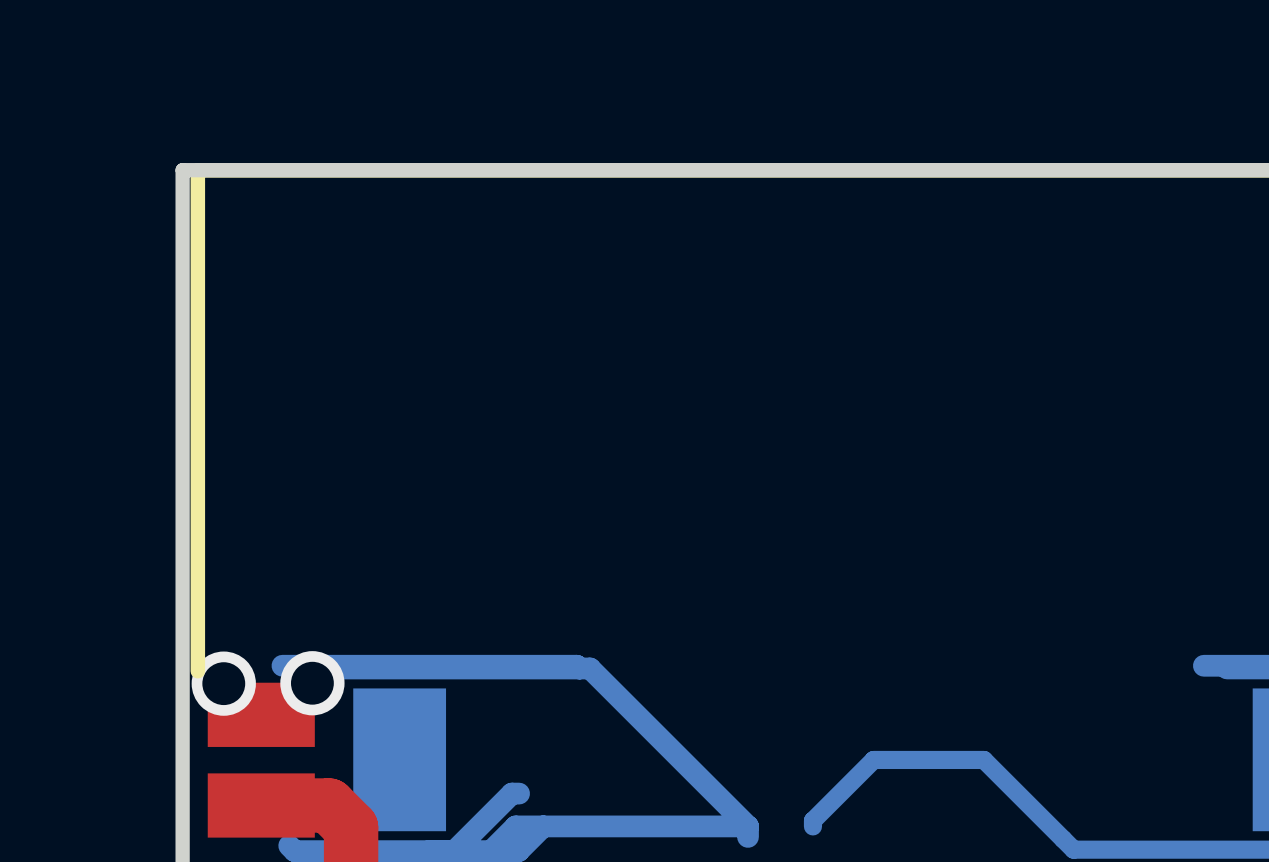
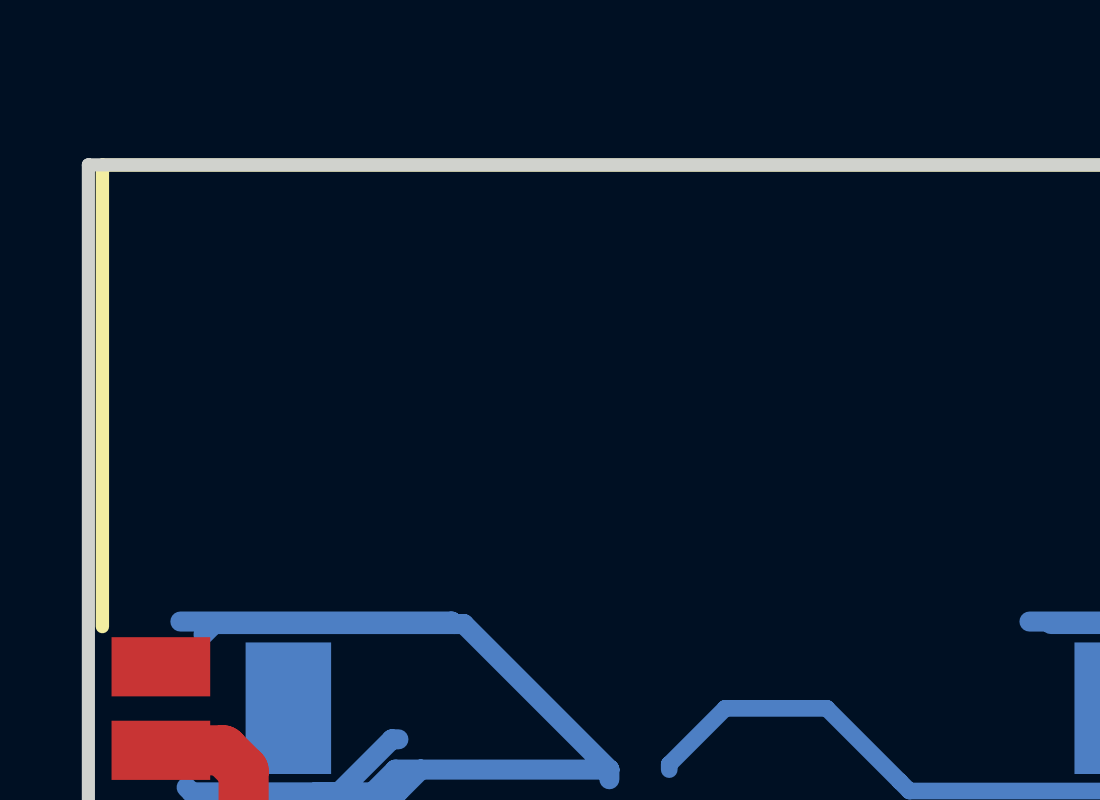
via: (223, 683) -> none
via: (312, 683) -> none

